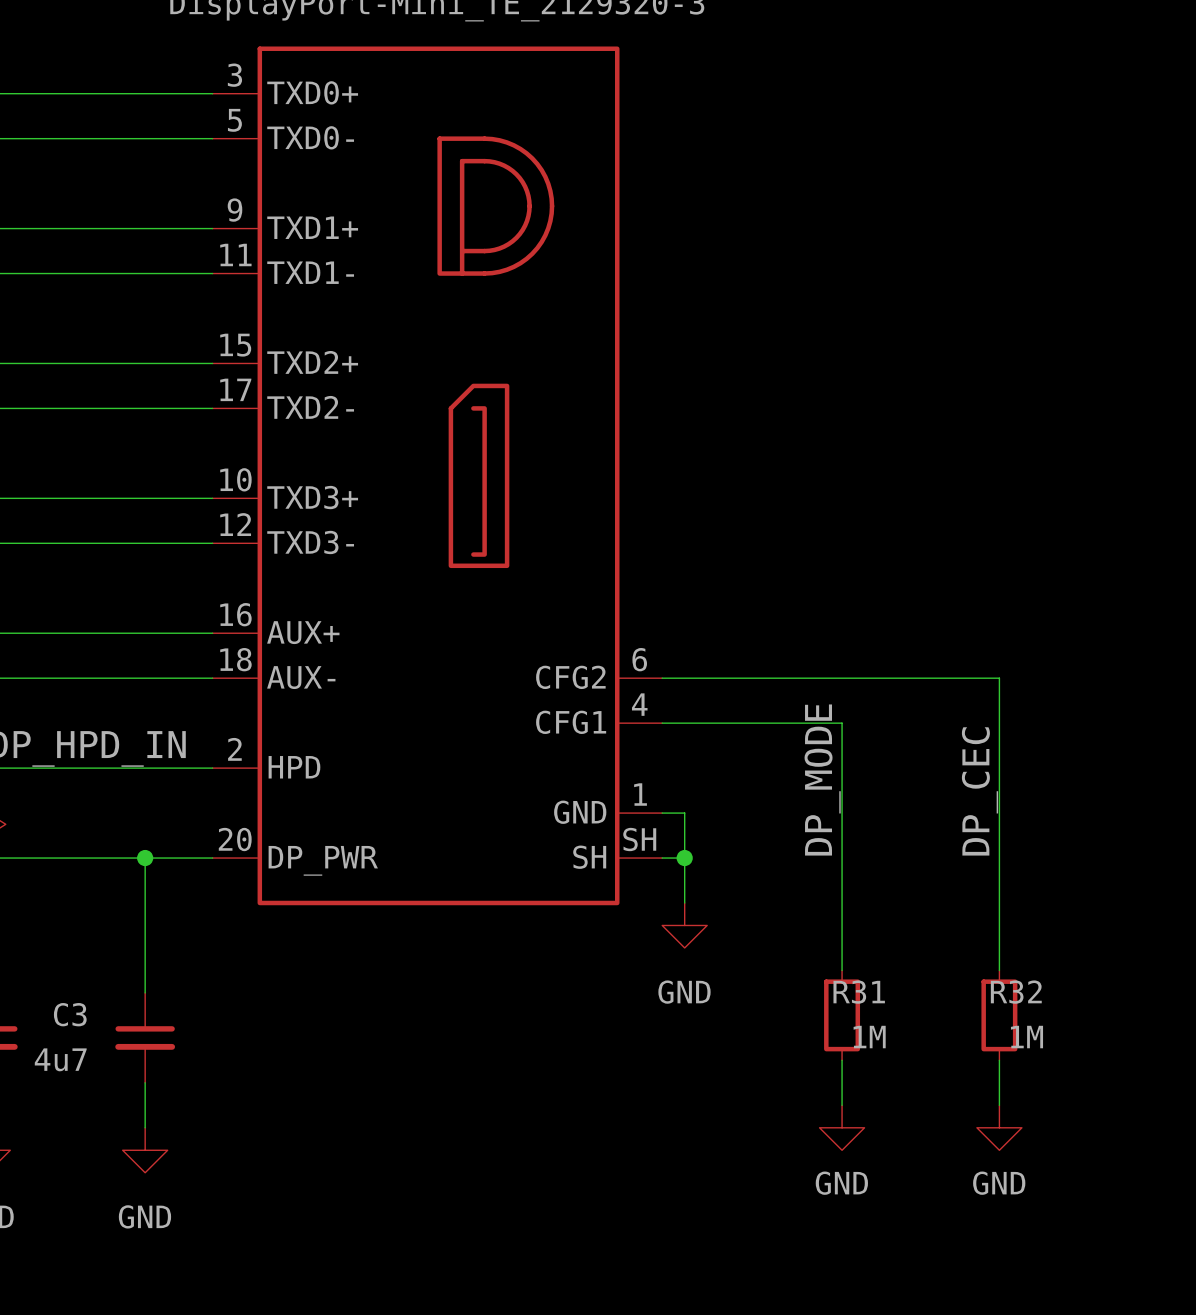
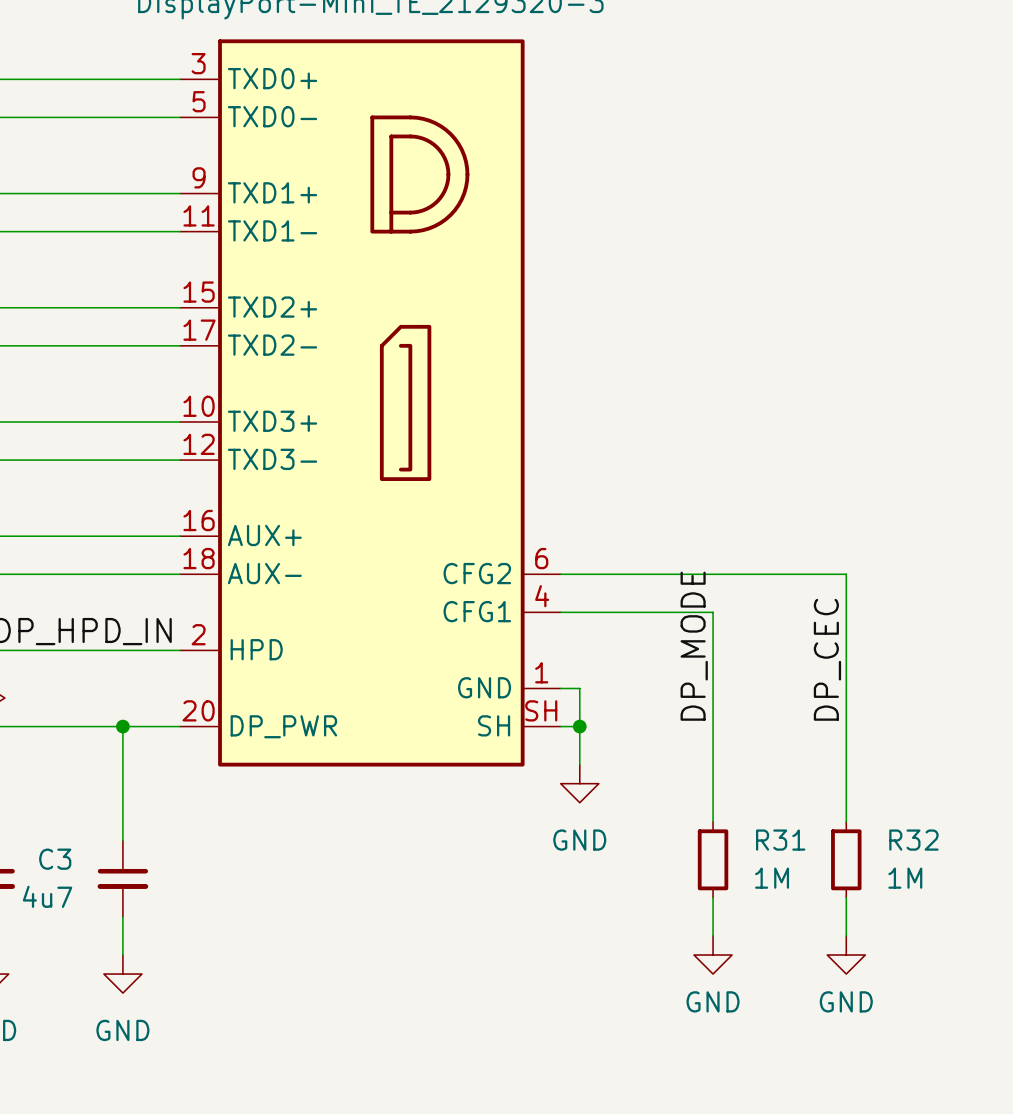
R31 name position: R31 (859, 992) -> R31 (780, 840)
R32 name position: R32 (1016, 992) -> R32 (913, 840)
R31 text position: 1M (869, 1037) -> 1M (772, 878)
R32 text position: 1M (1027, 1037) -> 1M (905, 878)

